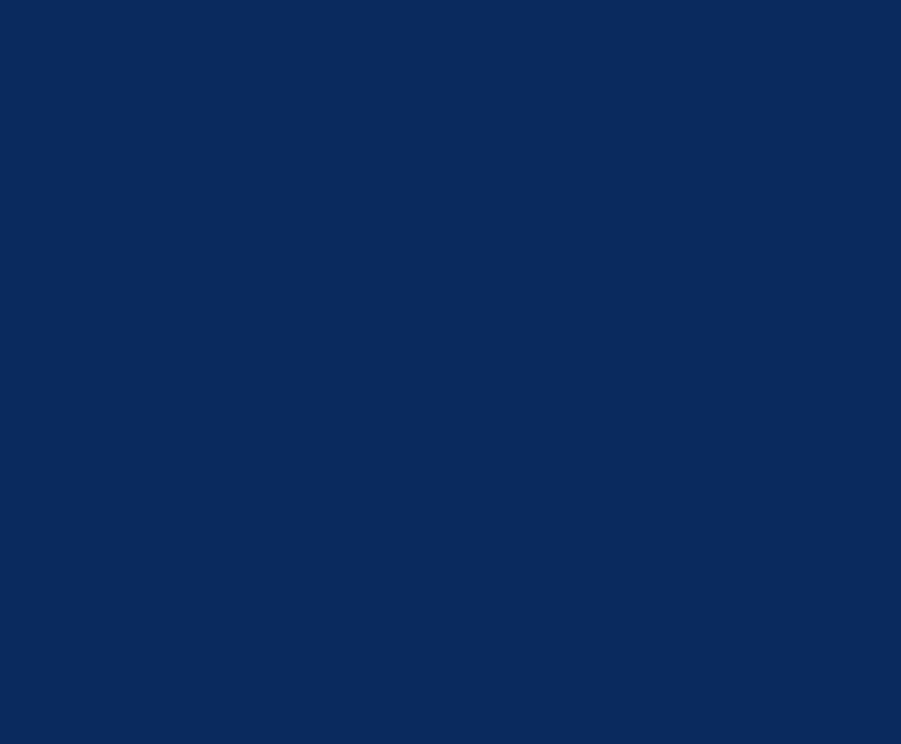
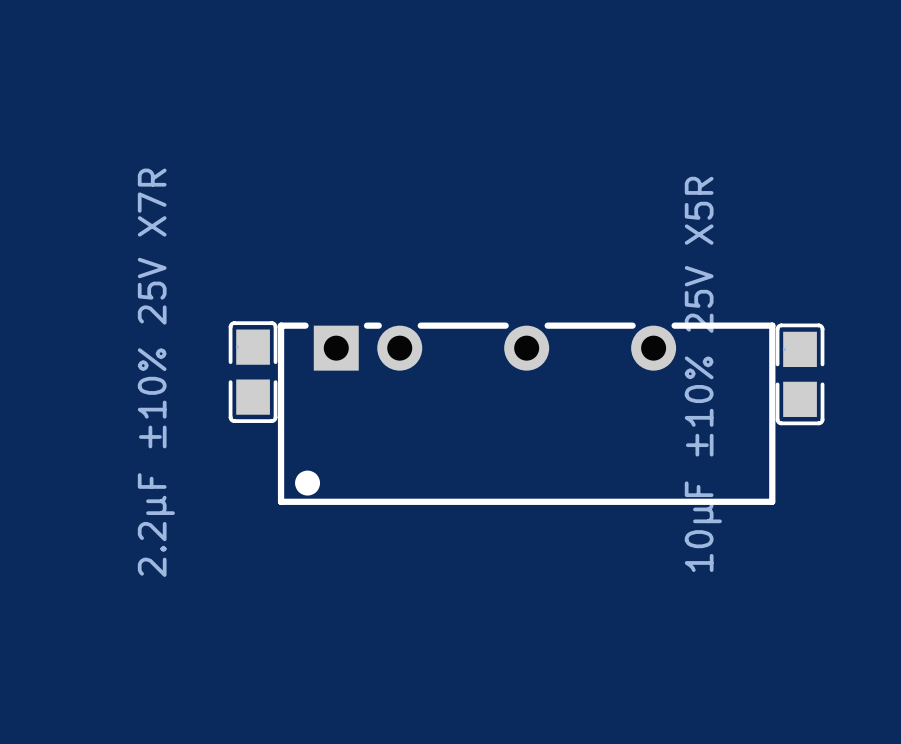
part: none -> 2.2µF ±10% 25V X7R (253, 372)
part: none -> 10µF ±10% 25V X5R (800, 374)
part: none -> (526, 413)

